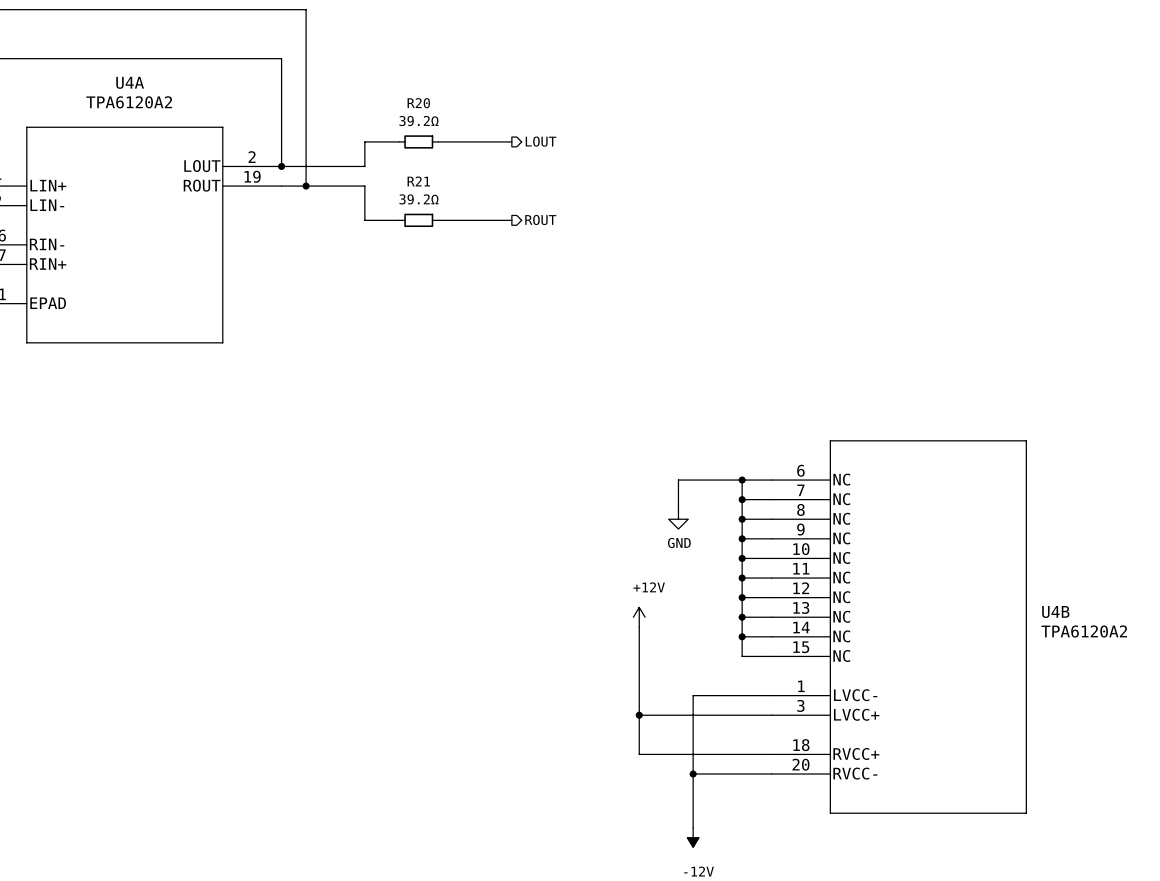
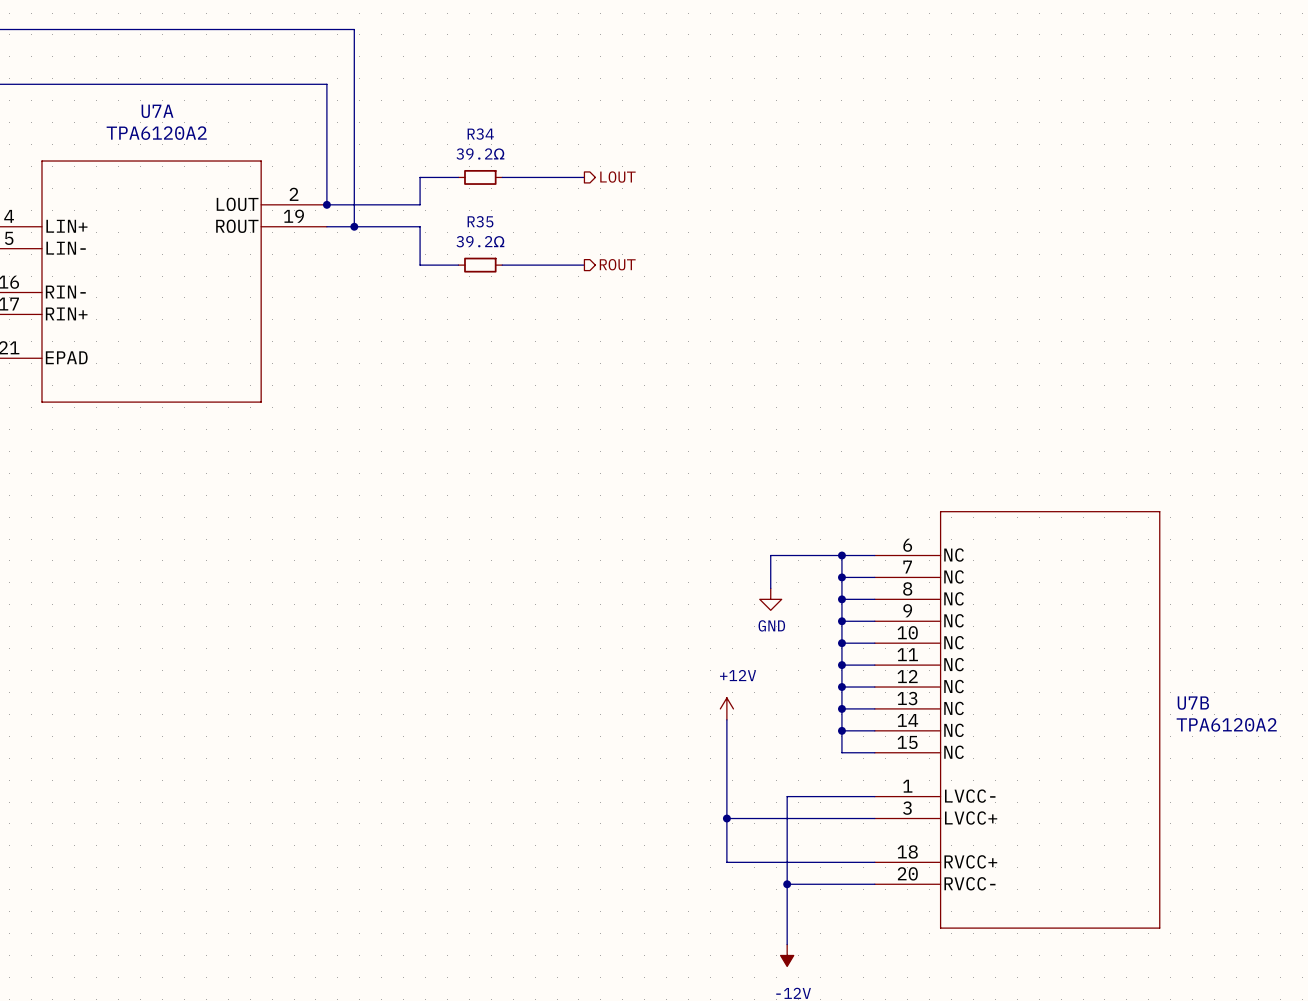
U4A name: U4A (130, 82) -> U7A (157, 111)
R20 name: R20 (418, 103) -> R34 (480, 134)
R21 name: R21 (418, 181) -> R35 (480, 221)
U4B name: U4B (1055, 612) -> U7B (1193, 703)

